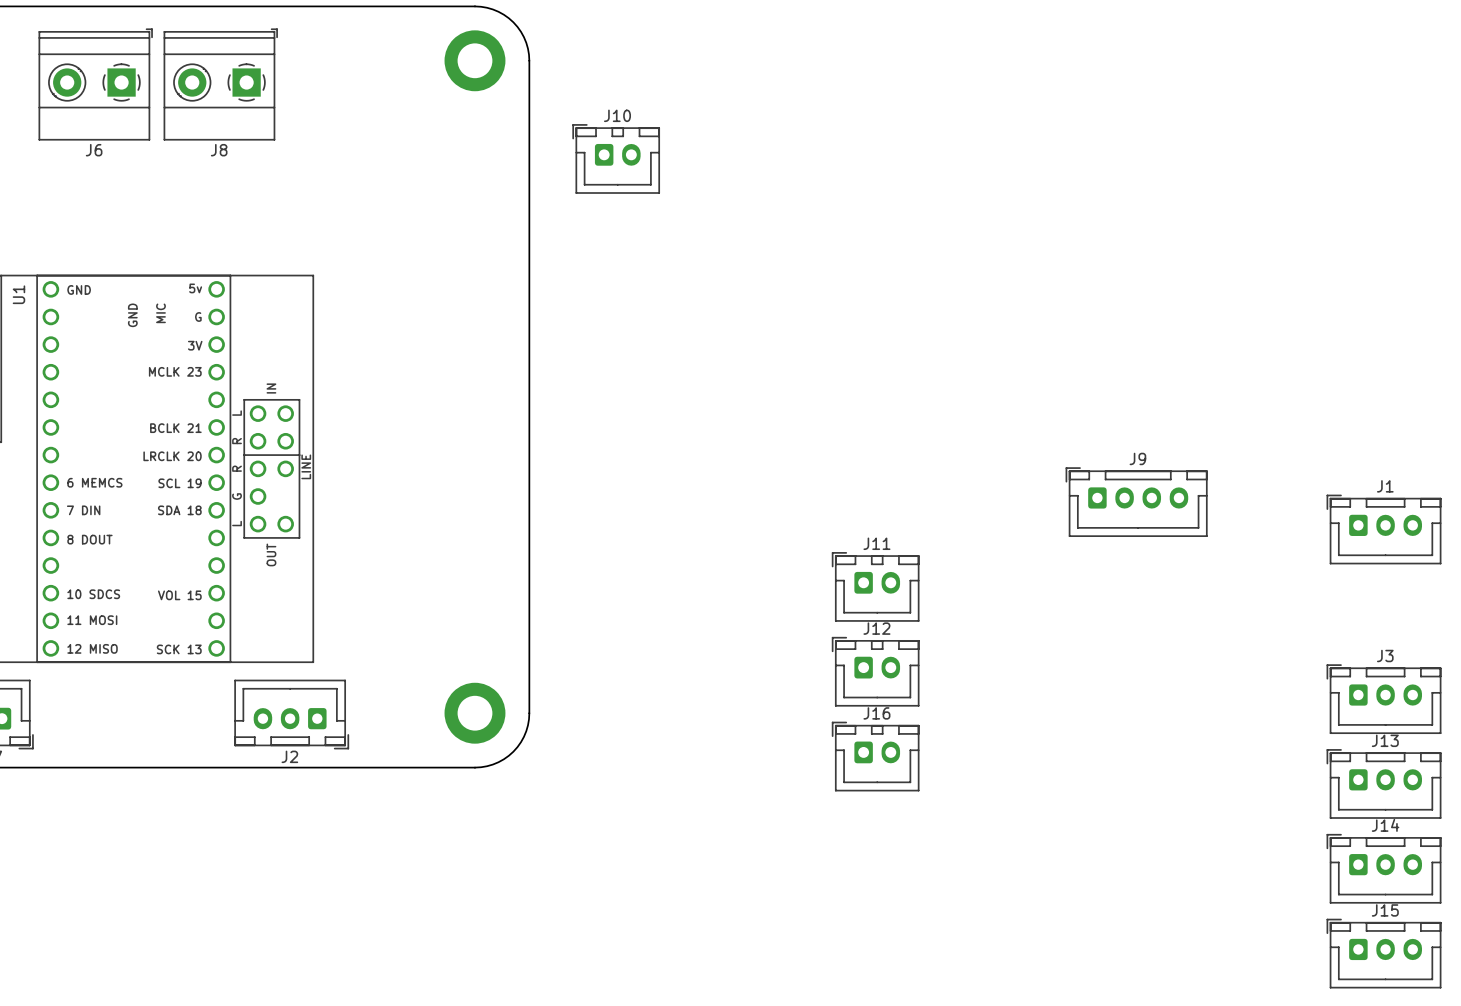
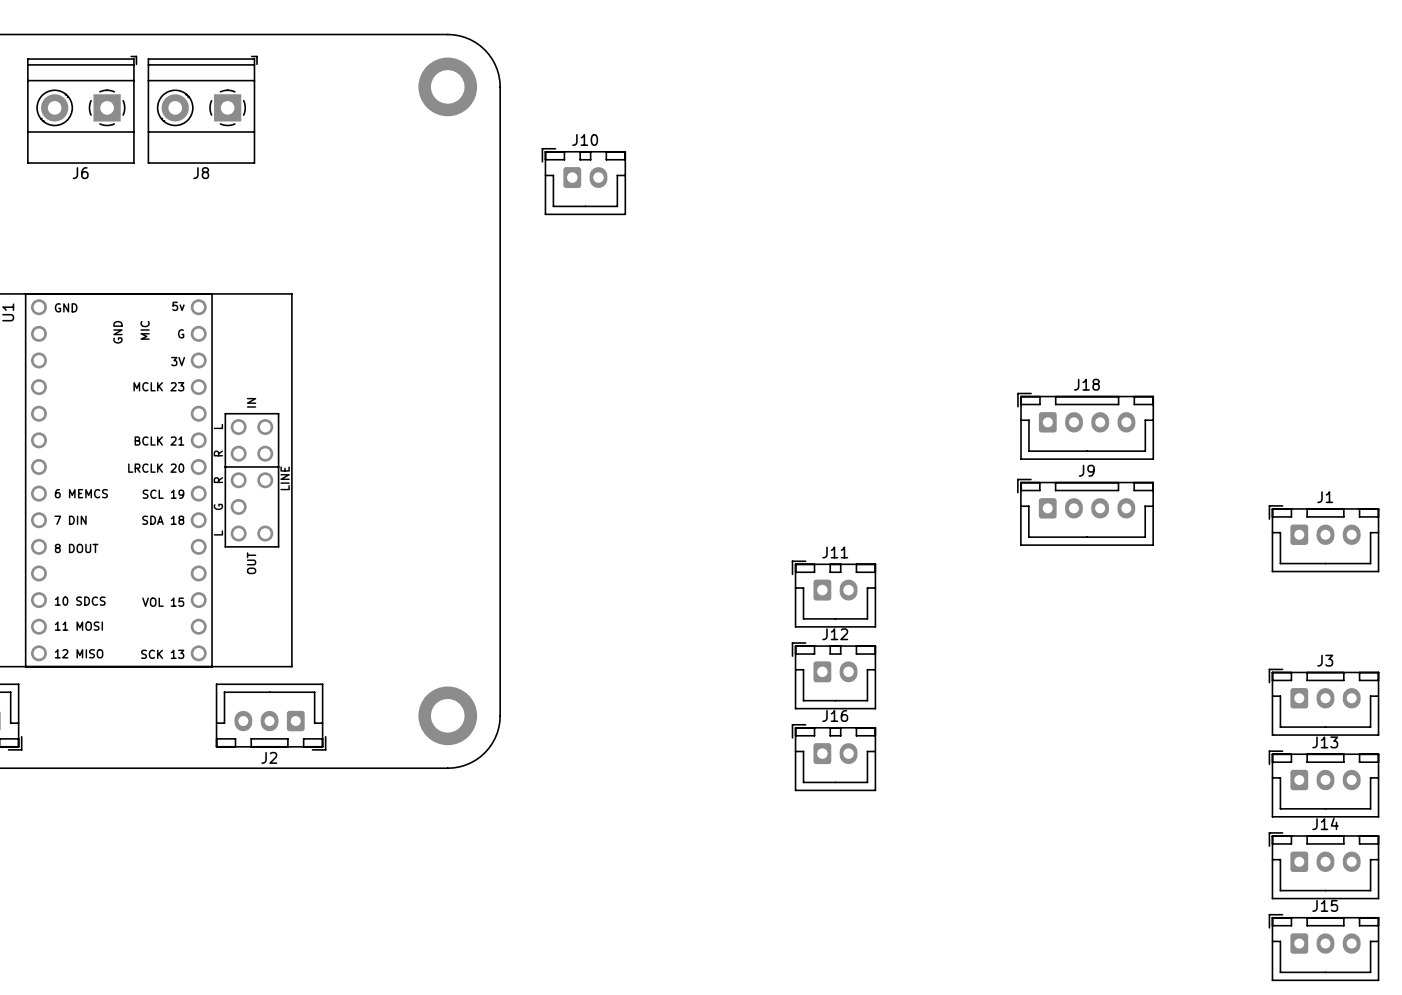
J18: none -> (1085, 426)

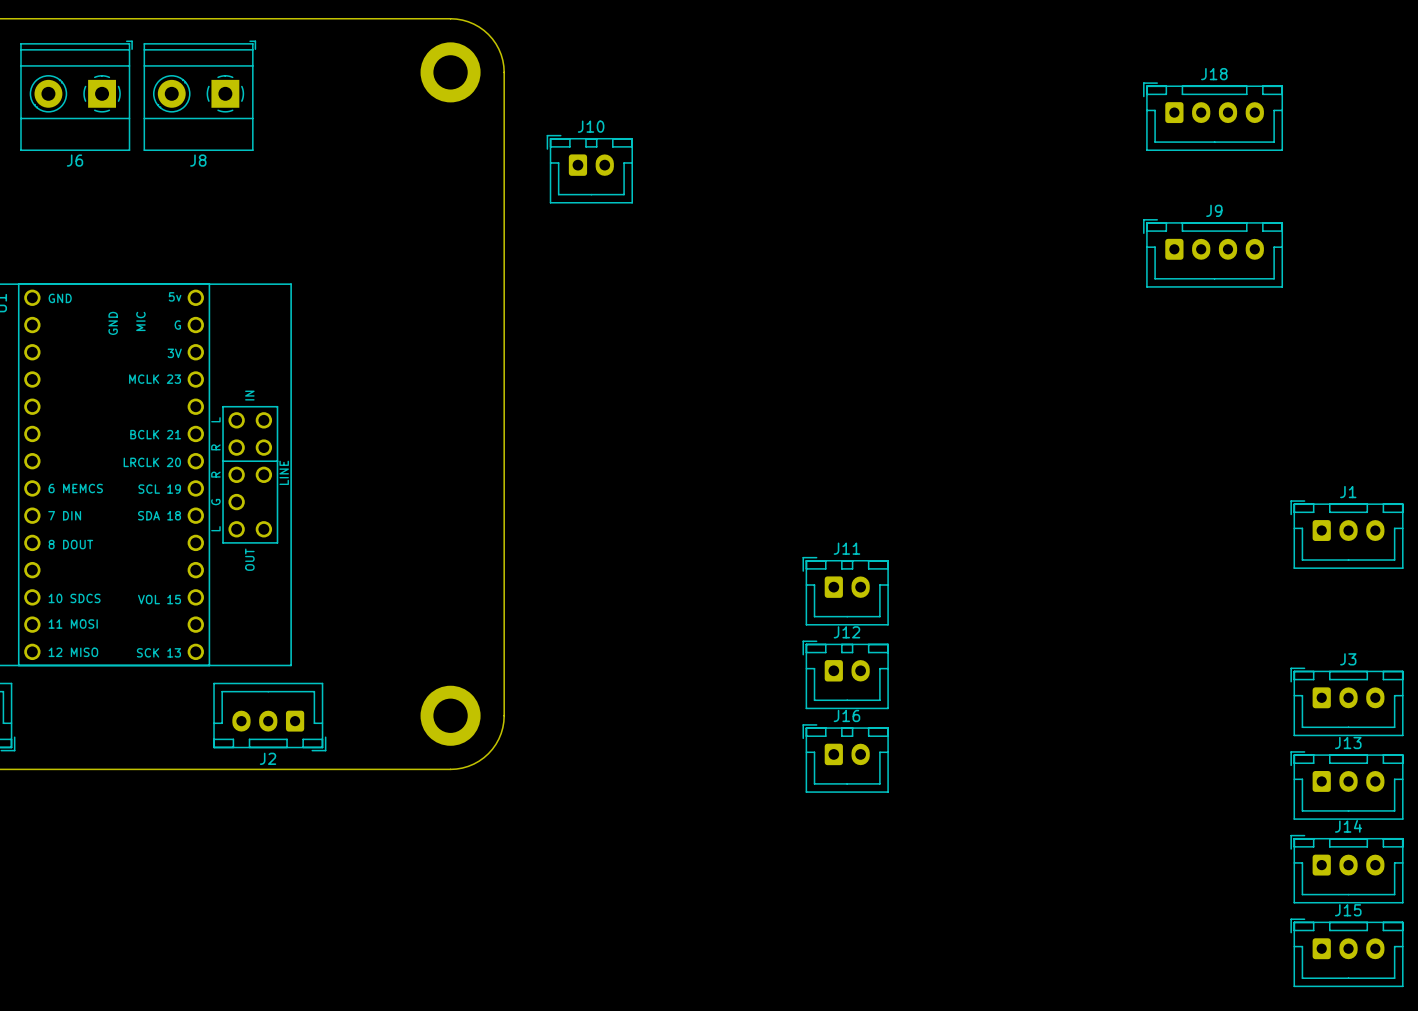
J18 position: (1085, 426) -> (1213, 116)
J9 position: (1085, 512) -> (1213, 253)

